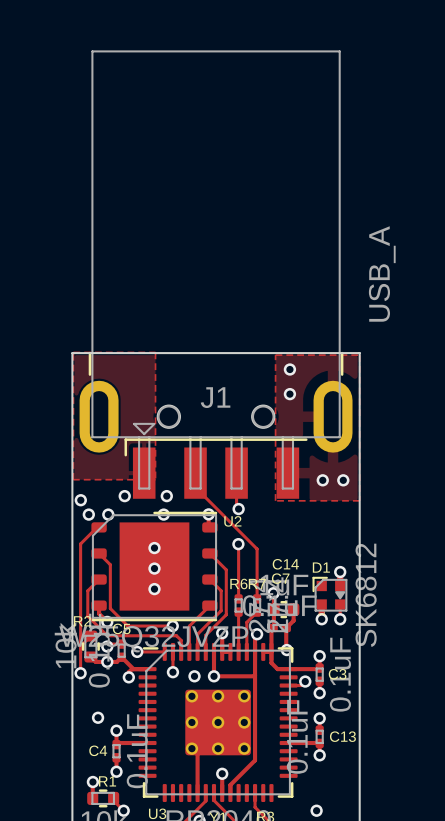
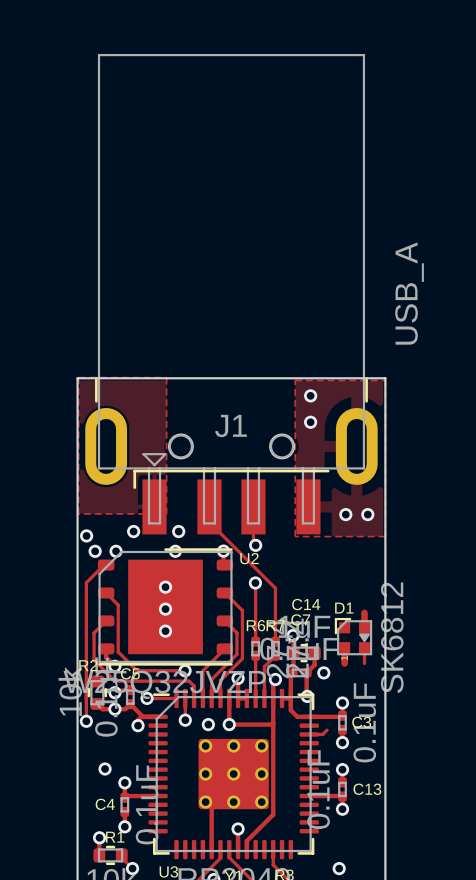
via: (340, 572) -> none
via: (321, 619) -> none
via: (340, 619) -> none
via: none -> (323, 672)
via: (305, 681) -> none

